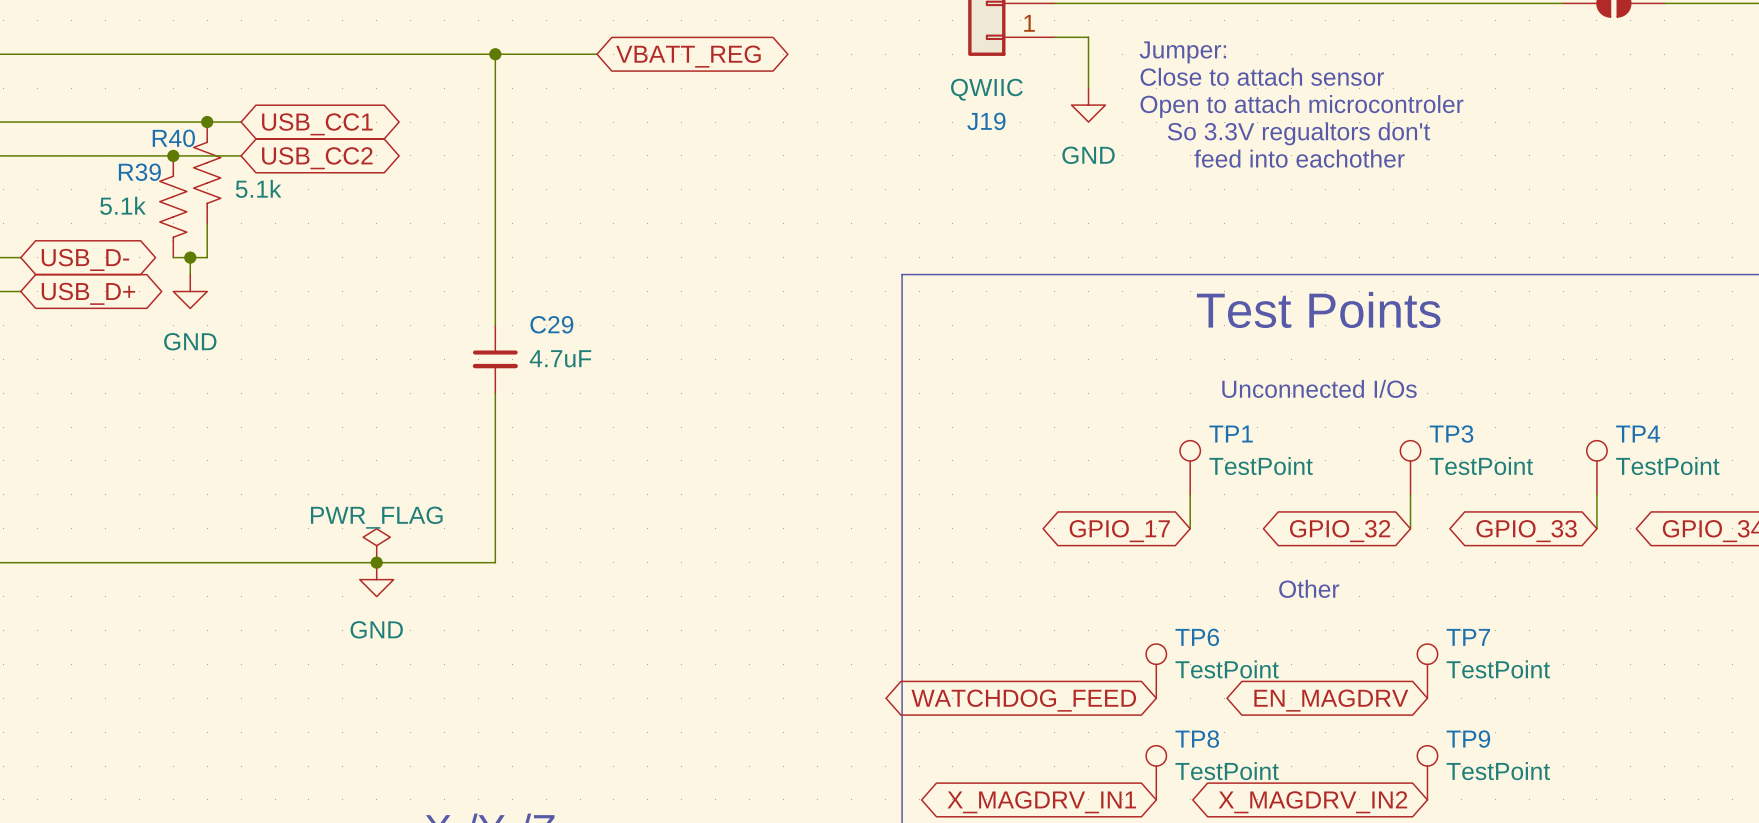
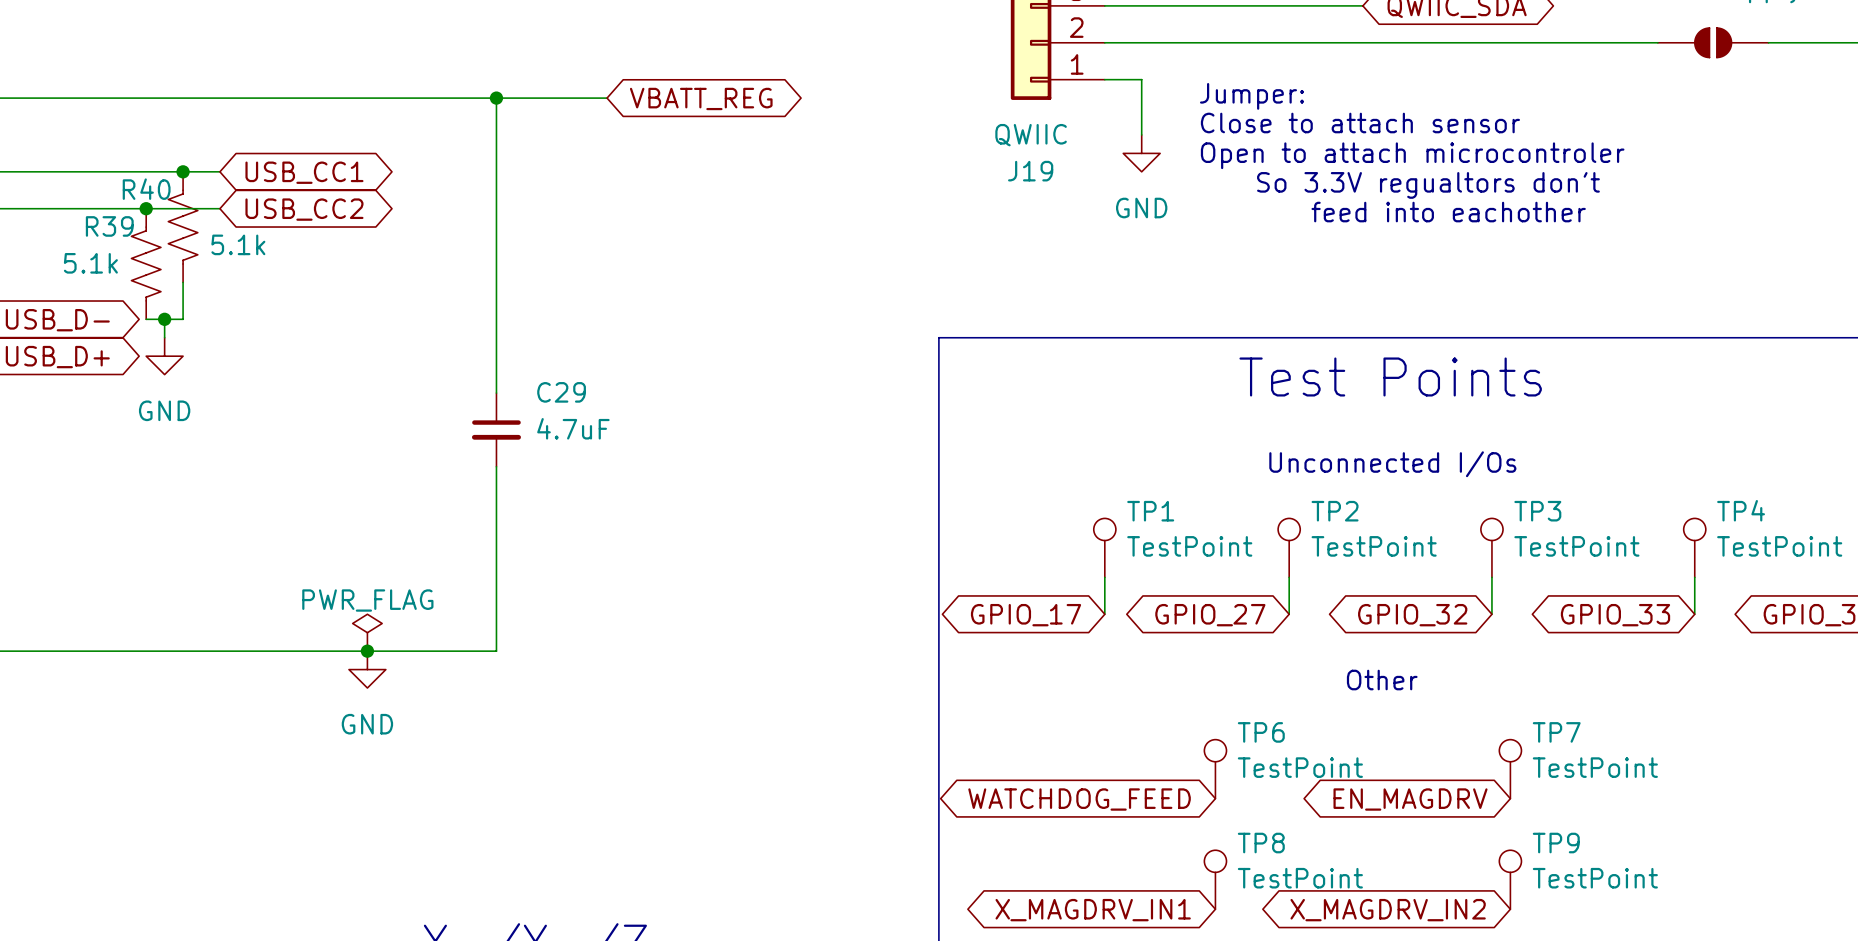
TP1 position: (1190, 467) -> (1104, 547)
TP2: none -> TestPoint (1289, 547)
wire: none -> (1104, 577) (1104, 614)
wire: (1190, 494) (1190, 528) -> (1289, 577) (1289, 614)
global label position: GPIO_17 (1119, 531) -> GPIO_17 (1026, 615)
global label: none -> GPIO_27 (1210, 615)

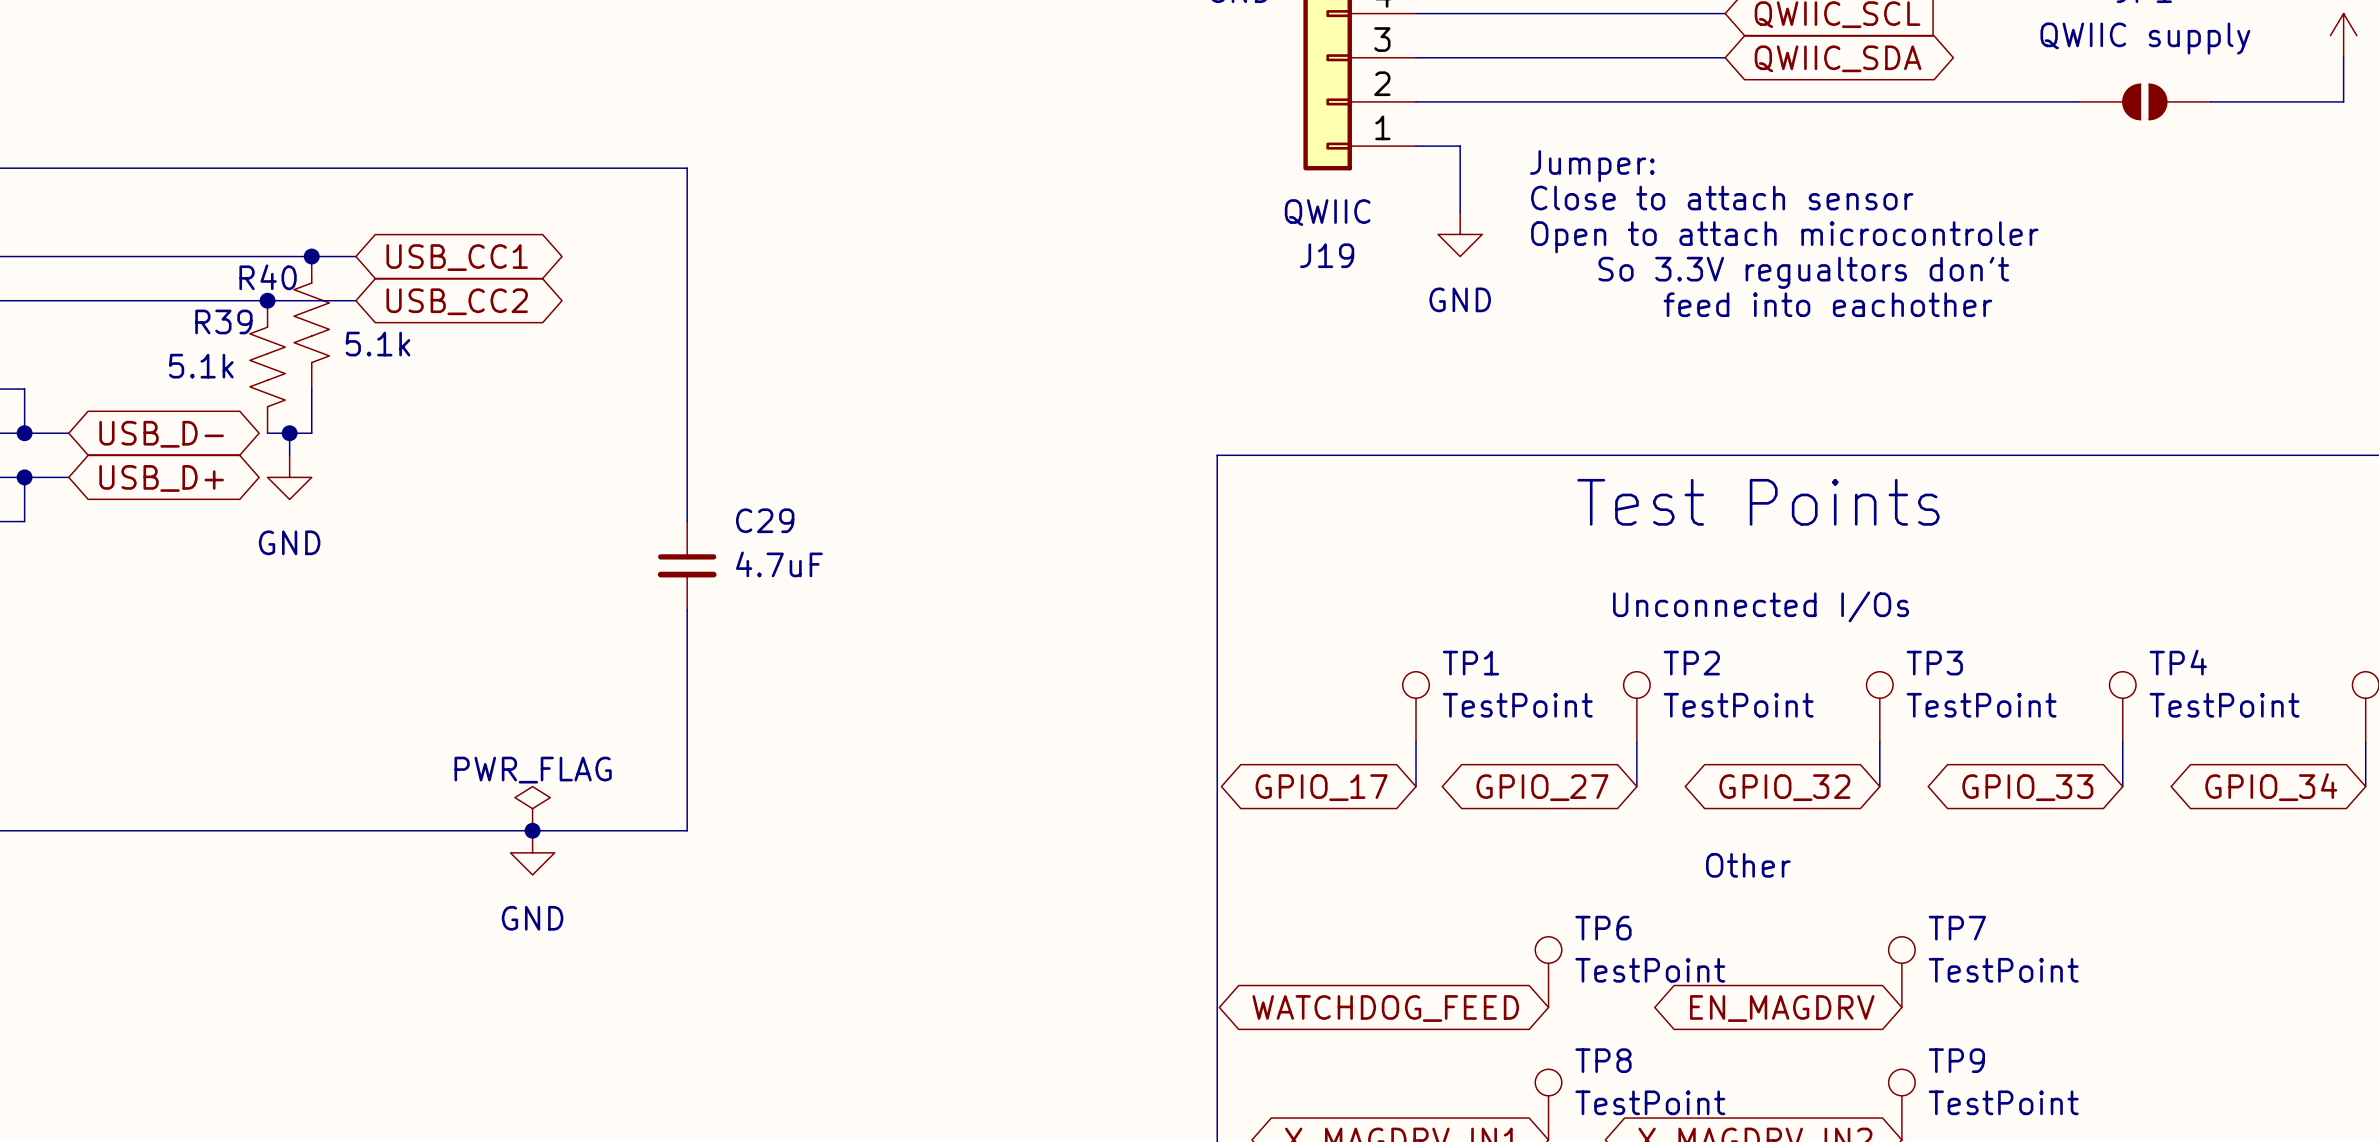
wire: (496, 98) (607, 98) -> none
junction: (496, 98) -> none
global label: VBATT_REG (701, 98) -> none

